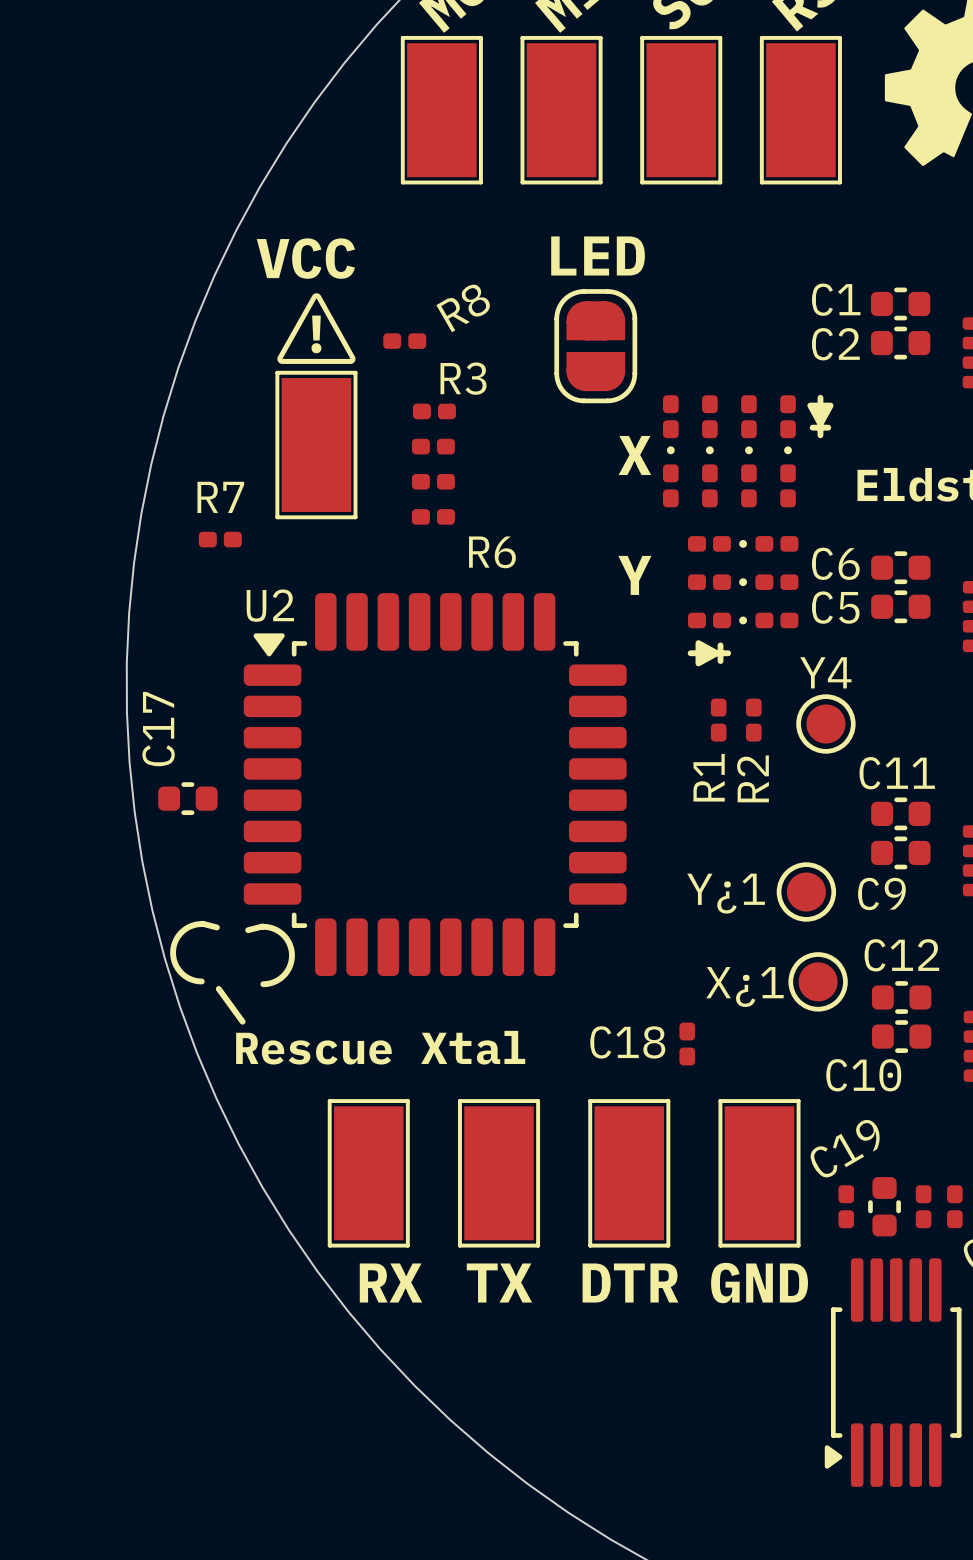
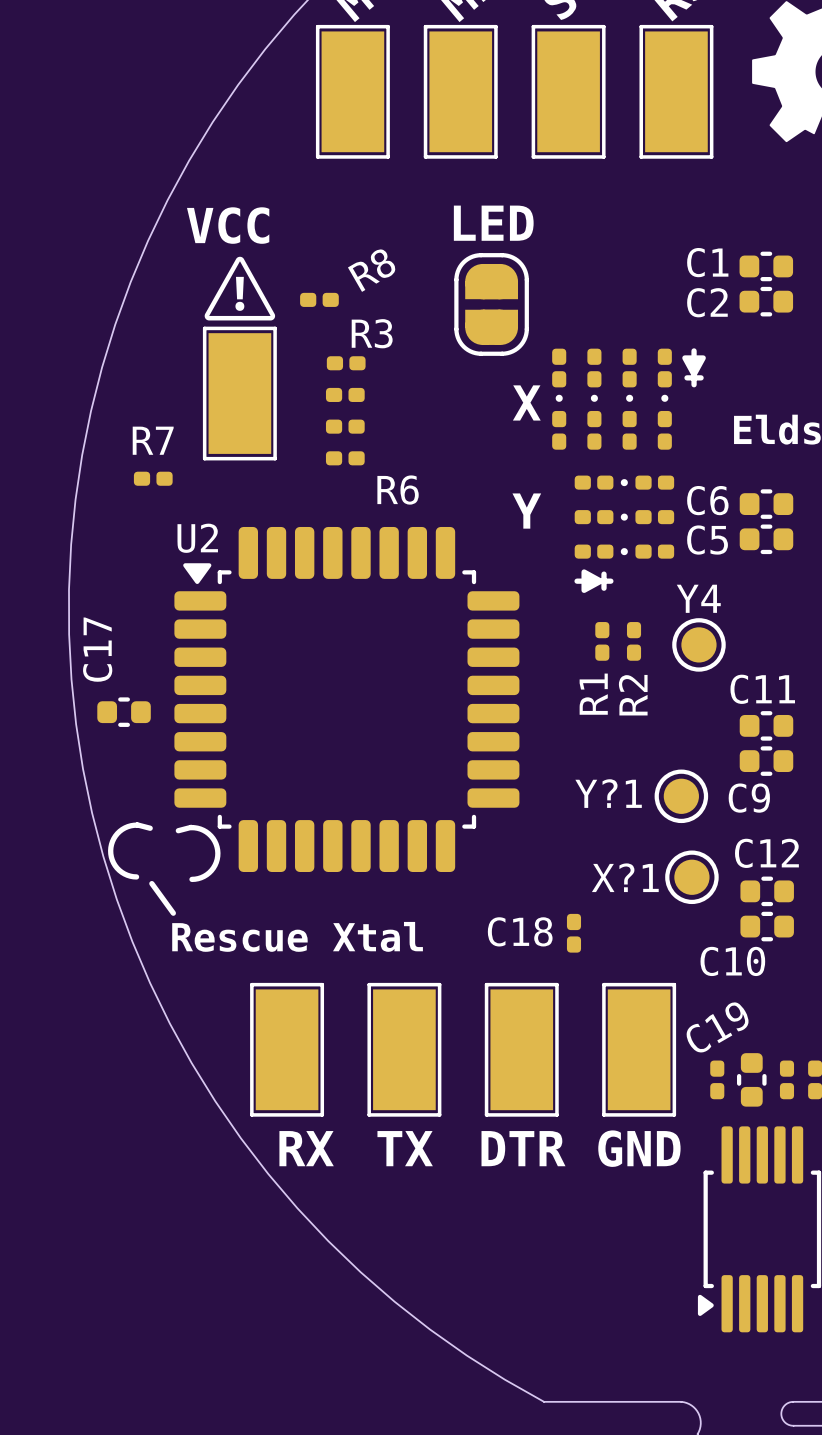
Y¿1 name: Y¿1 (726, 893) -> Y?1 (608, 793)
X¿1 name: X¿1 (744, 987) -> X?1 (625, 877)

